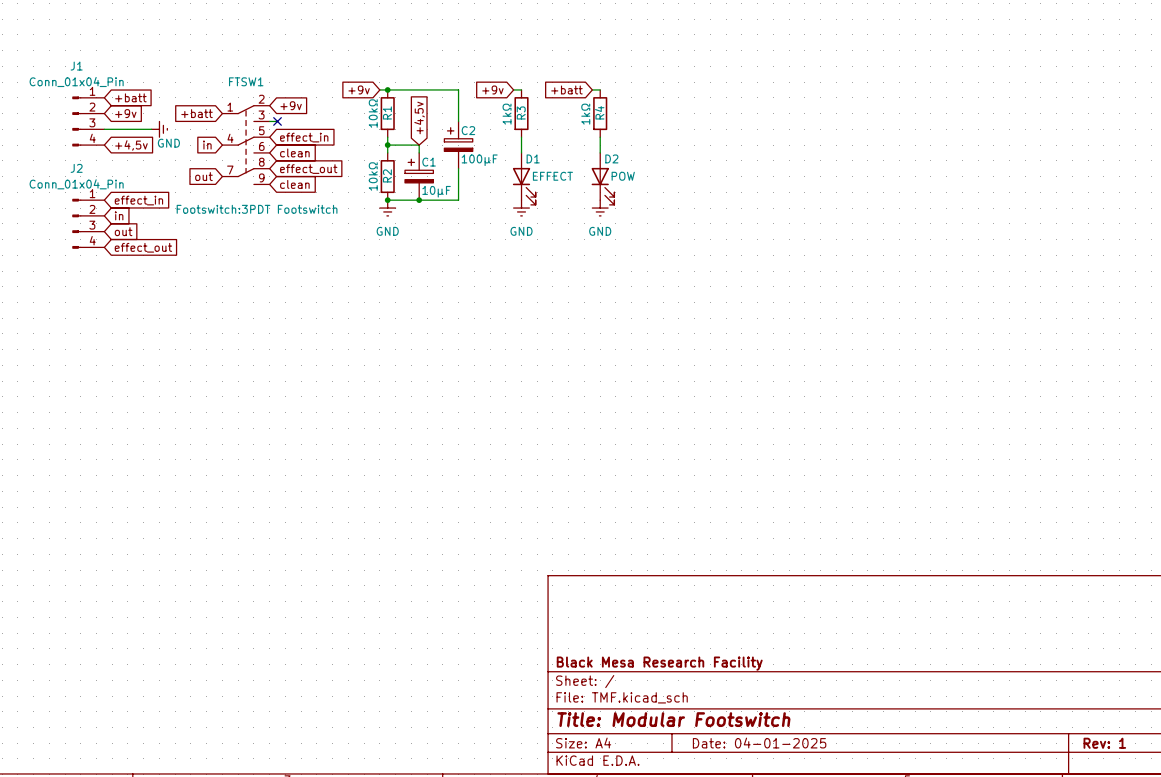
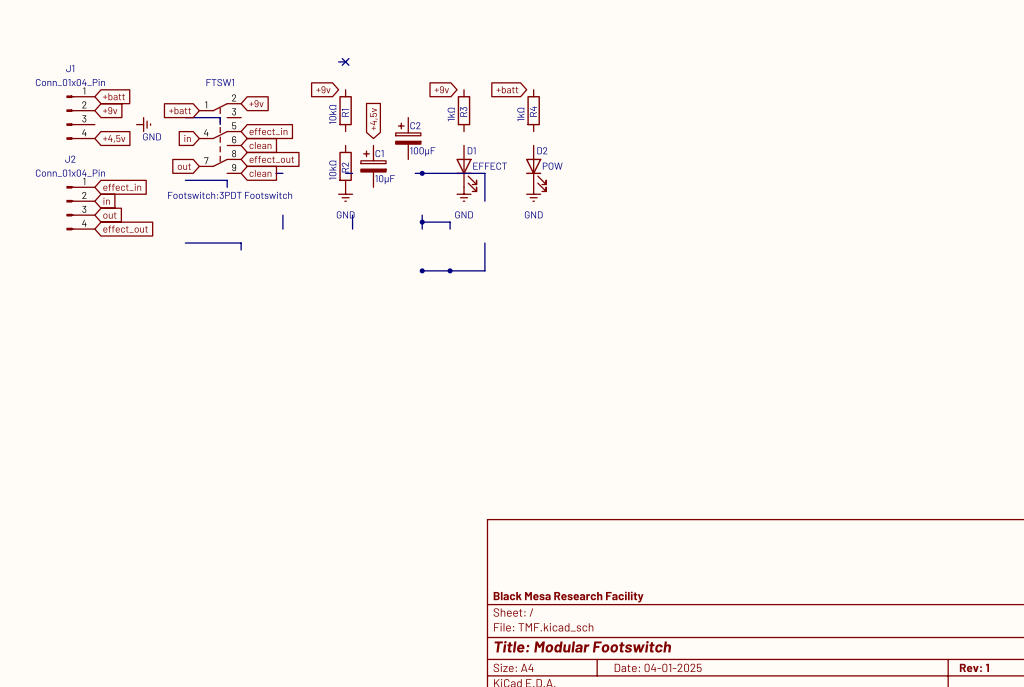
no-connect mark: none -> (345, 61)
wire: (379, 89) (458, 89) (458, 121) -> (415, 173) (484, 173) (484, 201)
junction: (387, 89) -> none
wire: (513, 89) (521, 89) -> (338, 61) (345, 61)
wire: (592, 89) (600, 89) -> none
wire: none -> (185, 117) (220, 117) (220, 124)
wire: (269, 121) (277, 121) -> (275, 173) (282, 173)
no-connect mark: (277, 121) -> none
wire: (104, 129) (151, 129) -> none
wire: (387, 137) (387, 152) -> (422, 215) (422, 229)
wire: (521, 137) (521, 152) -> none
wire: (600, 137) (600, 152) -> none
wire: (387, 145) (419, 145) (419, 152) -> (422, 222) (450, 222) (450, 229)
junction: (387, 145) -> none
wire: (458, 168) (458, 200) (387, 200) -> (484, 243) (484, 270) (422, 270)
wire: none -> (345, 173) (352, 173)
junction: none -> (422, 173)
wire: none -> (185, 180) (227, 180) (227, 187)
junction: (387, 200) -> none
junction: (419, 200) -> none
wire: none -> (282, 215) (282, 229)
wire: none -> (352, 215) (352, 229)
junction: none -> (422, 222)
wire: none -> (185, 243) (241, 243) (241, 249)
junction: none -> (422, 270)
junction: none -> (450, 270)

